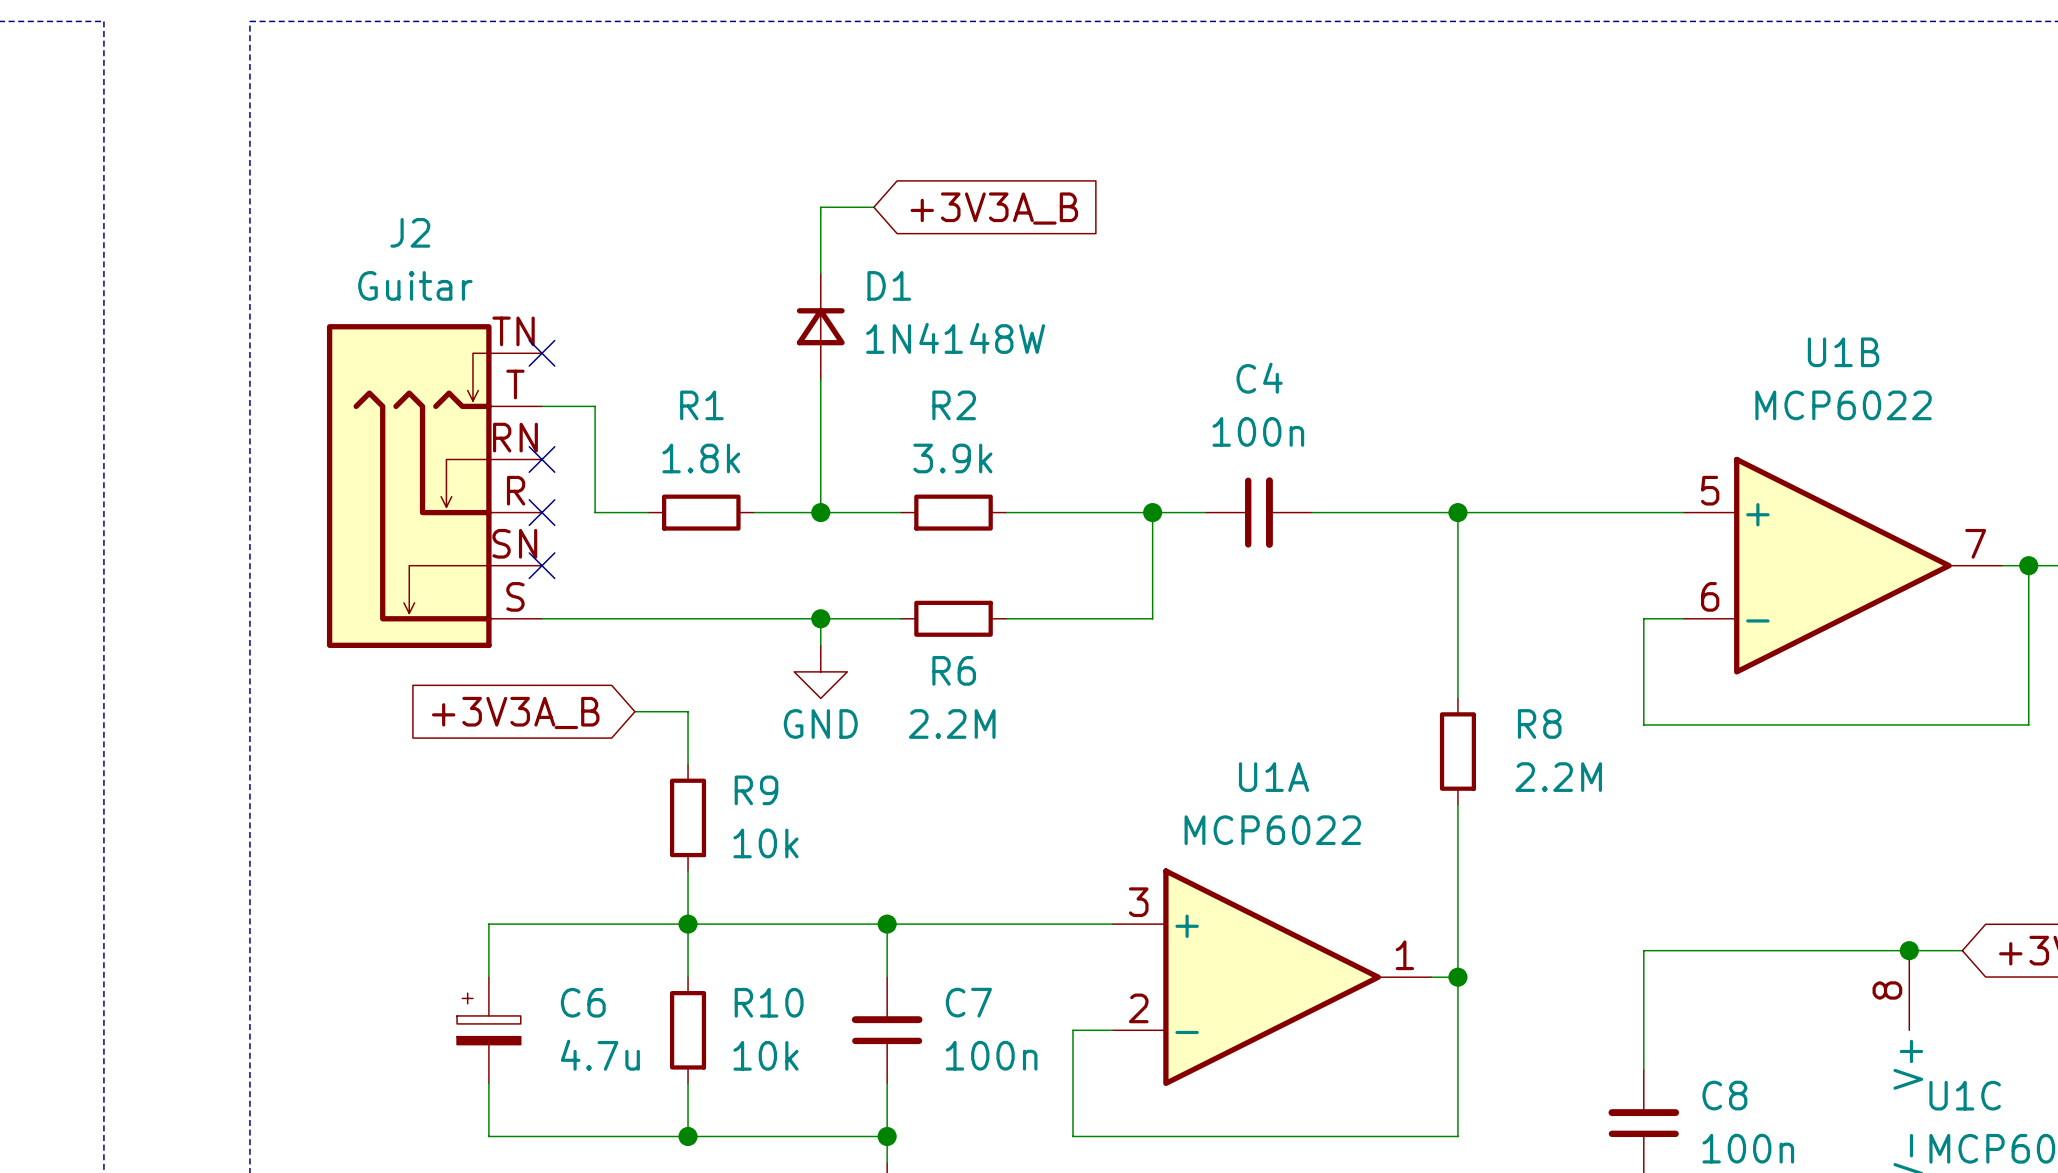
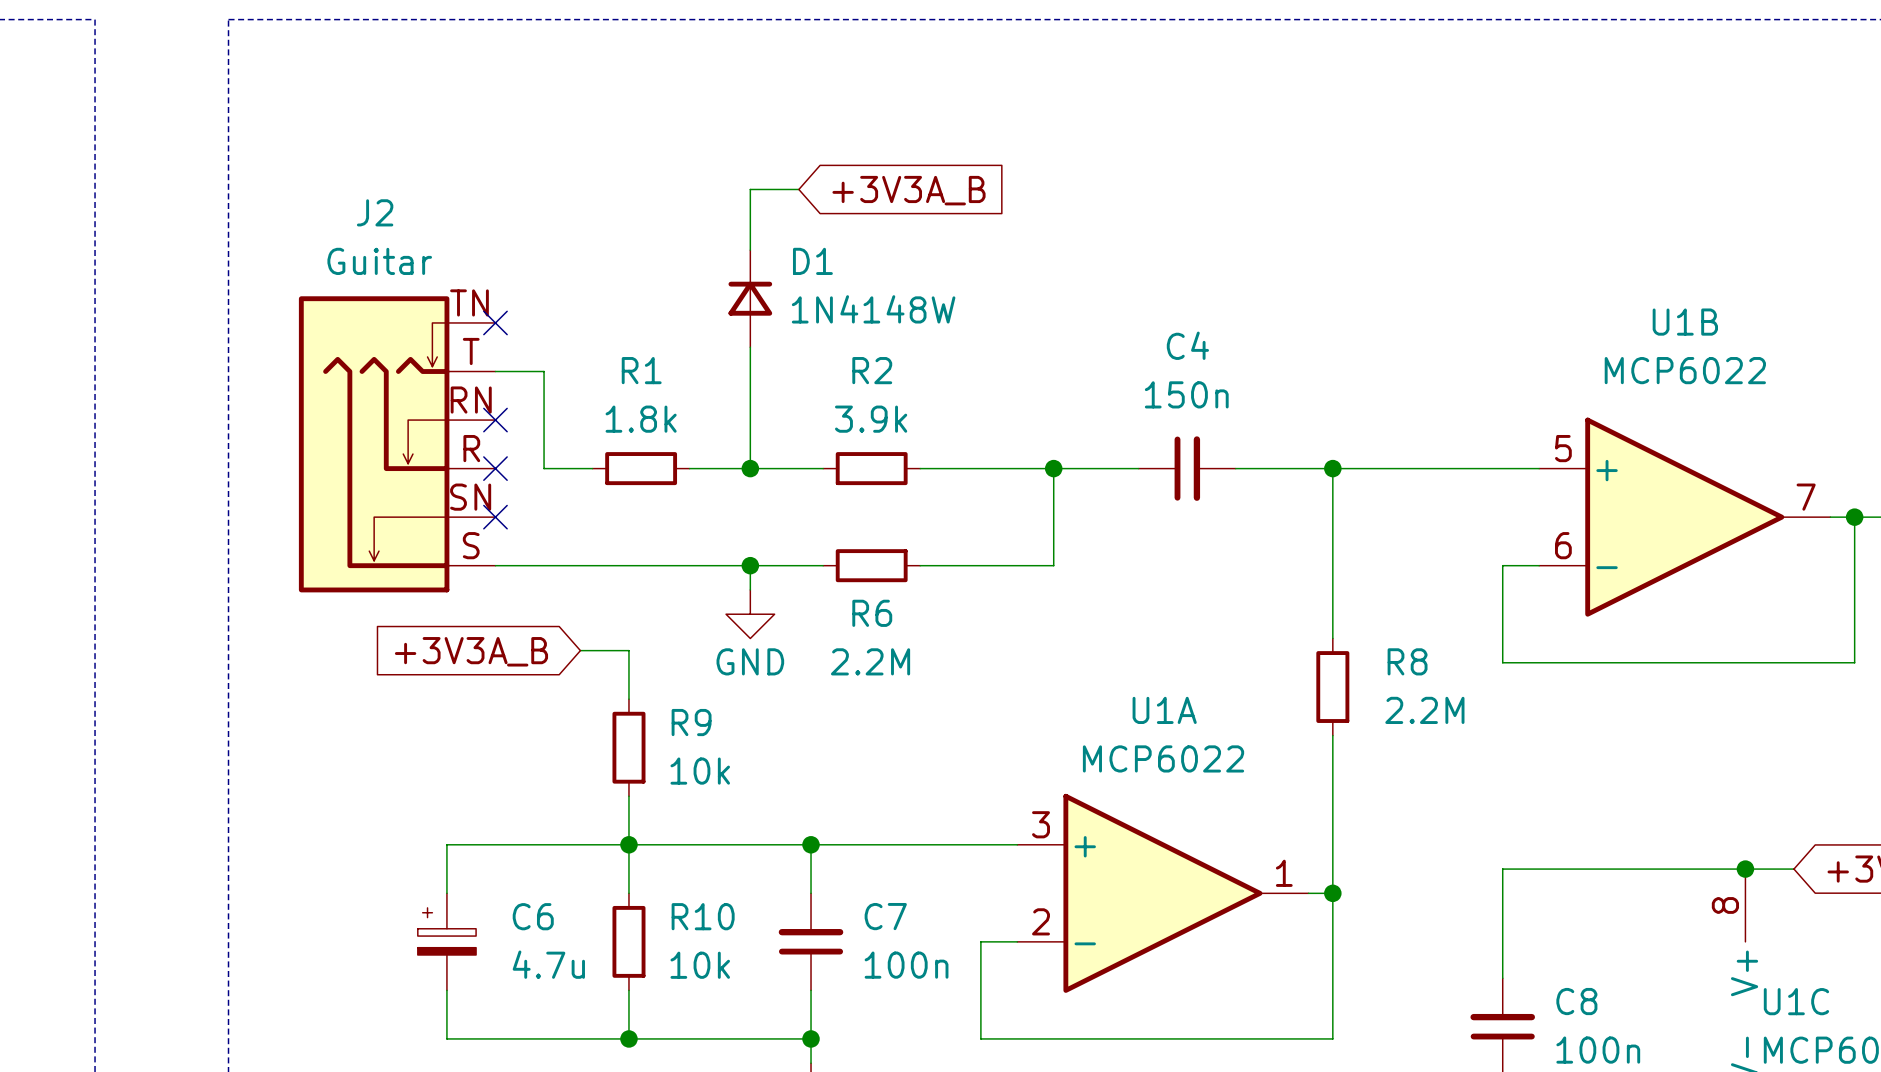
C4 value: 100n (1258, 431) -> 150n (1186, 394)
C4 position: (1258, 512) -> (1187, 468)

